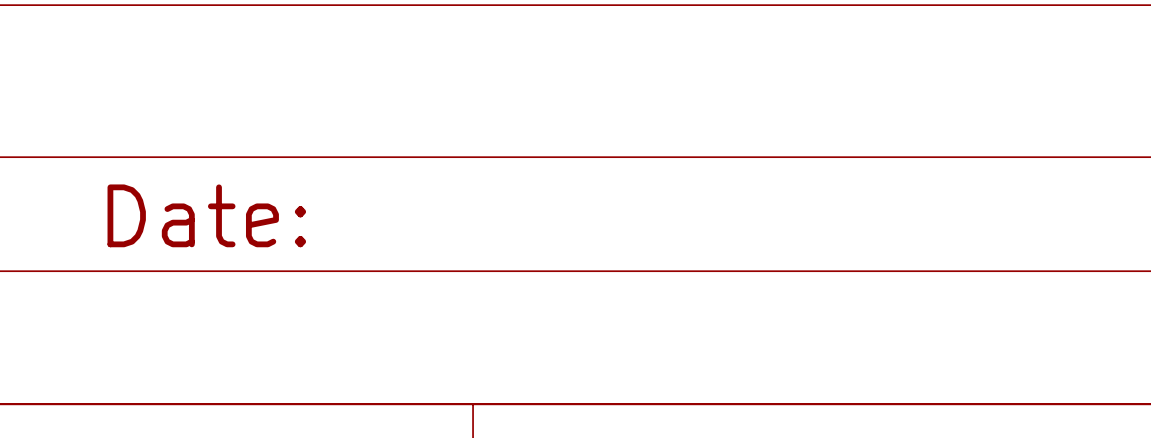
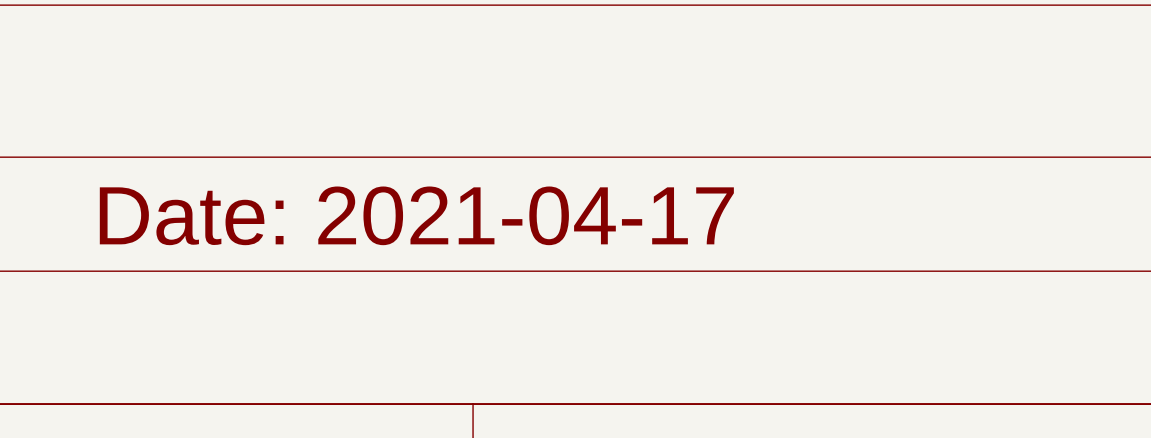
title block: Date: (206, 215) -> Date: 2021-04-17 (416, 215)

